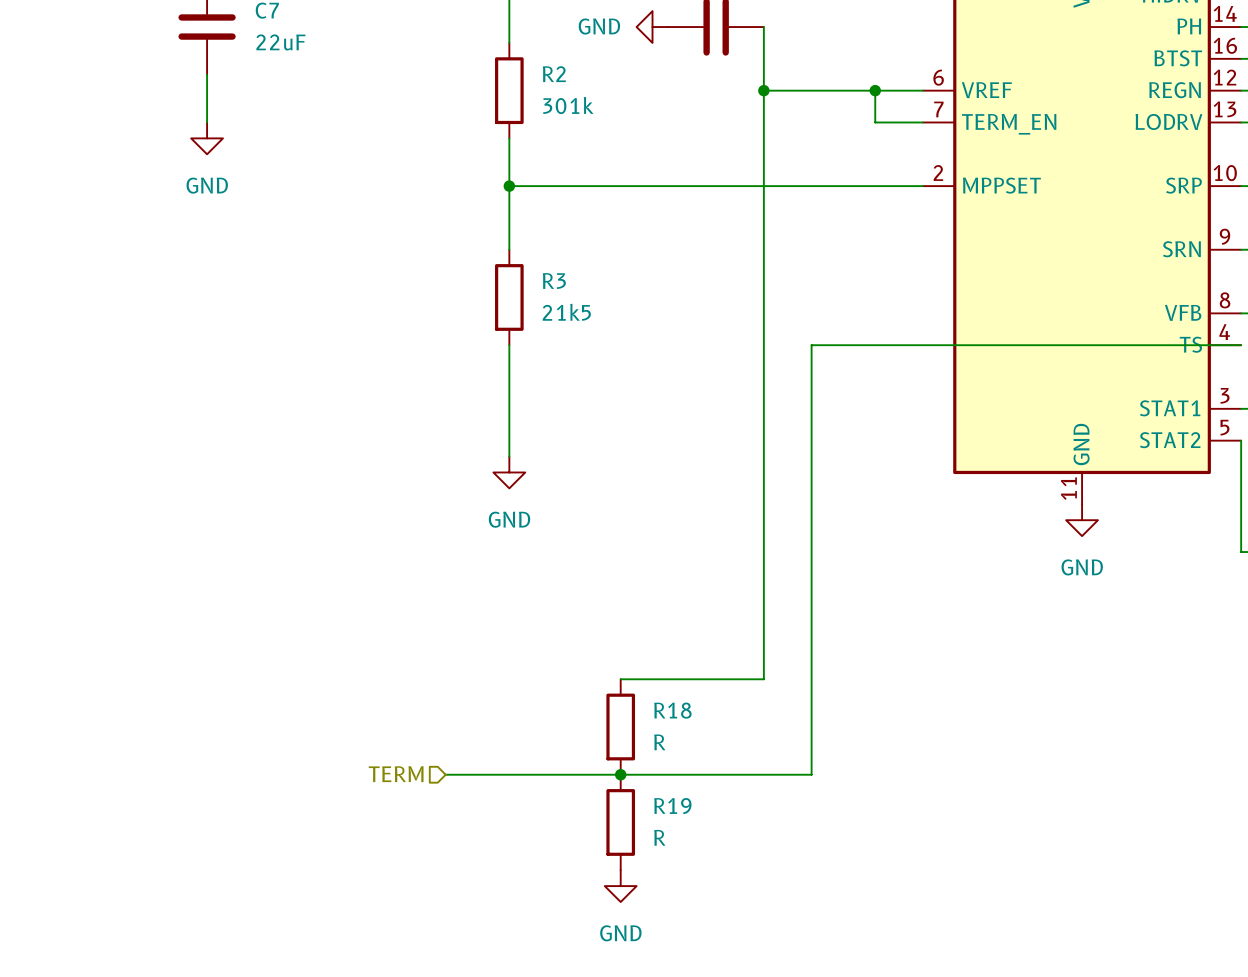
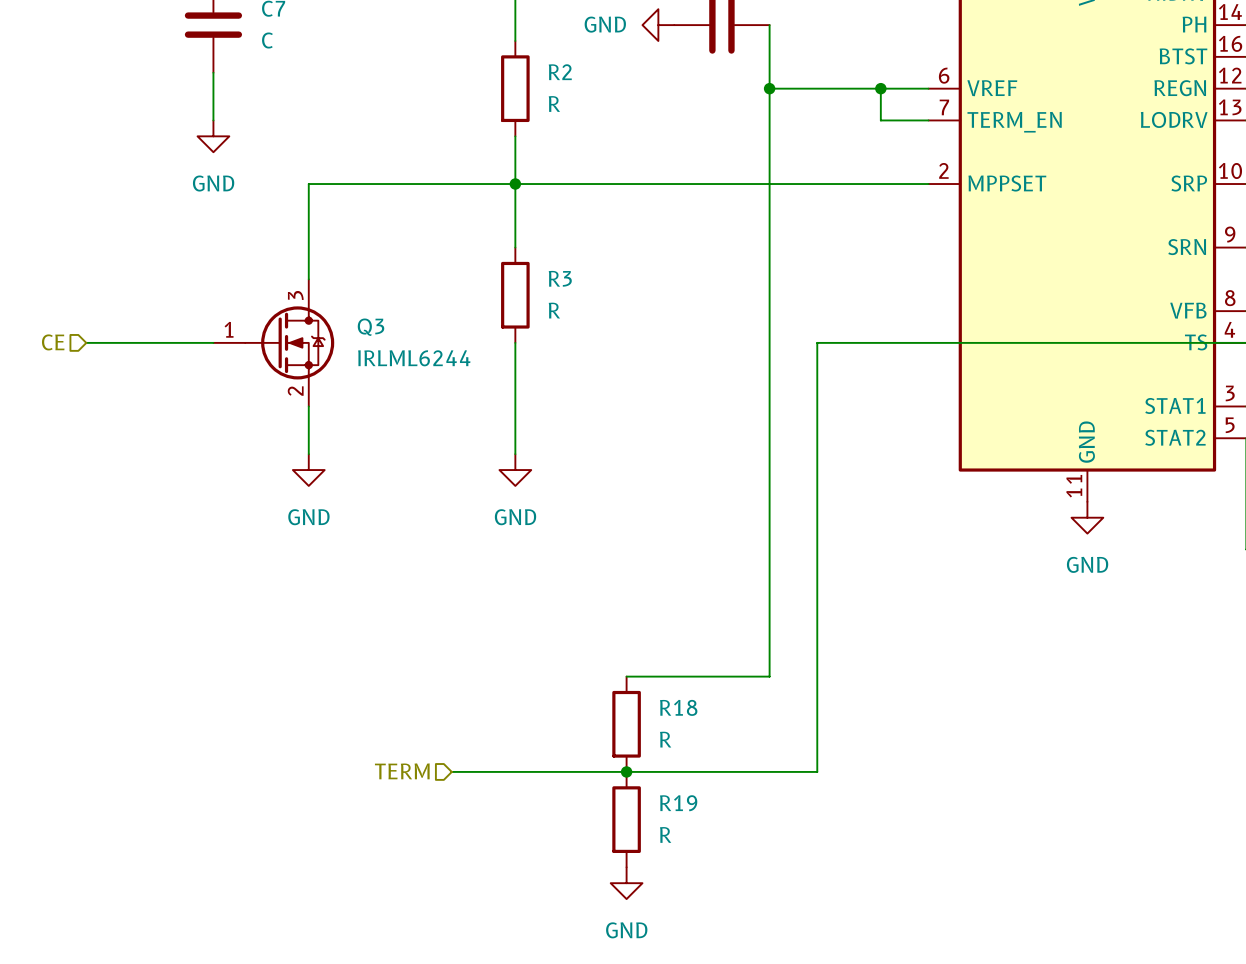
C7 value: 22uF (280, 42) -> C (267, 40)
R2 value: 301k (568, 105) -> R (554, 104)
wire: none -> (515, 184) (308, 184) (308, 279)
R3 value: 21k5 (566, 312) -> R (554, 310)
hierarchical label: none -> CE (53, 342)
wire: none -> (86, 342) (213, 342)
Q3: none -> IRLML6244 (273, 342)
wire: none -> (308, 406) (308, 454)
power symbol: none -> GND (308, 470)

